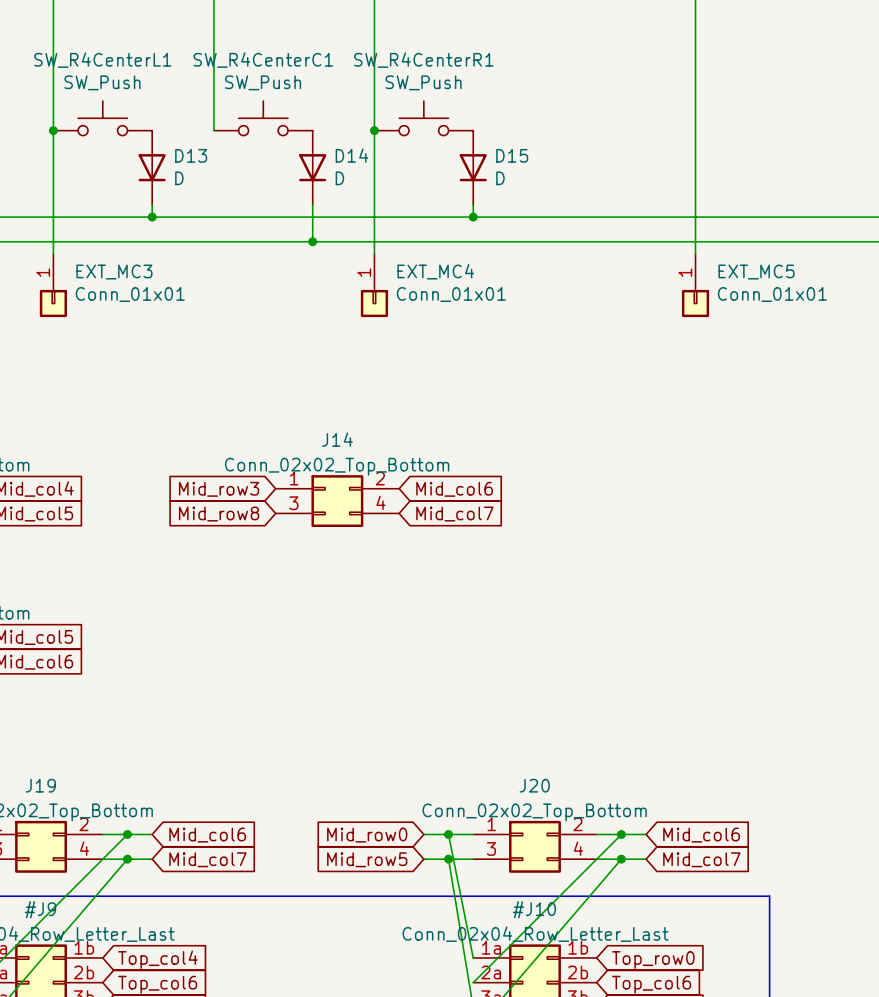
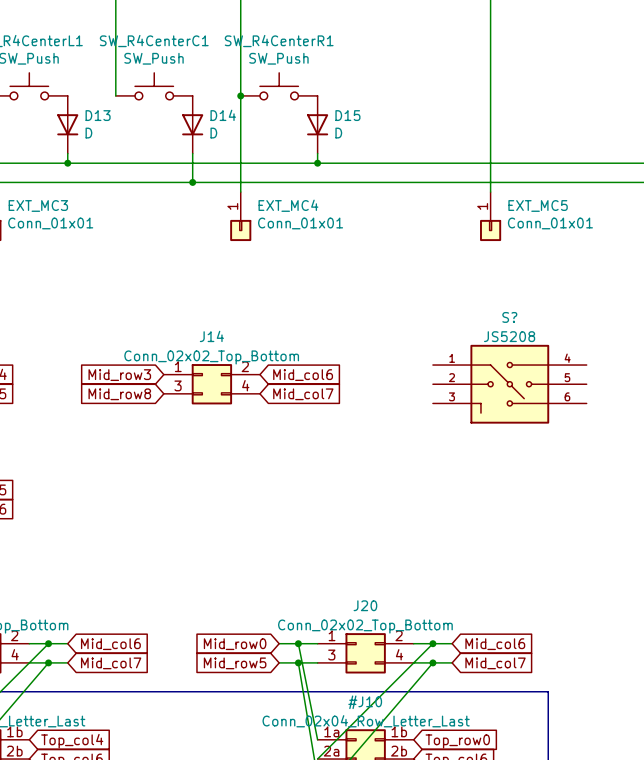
S?: none -> JS5208 (509, 384)

